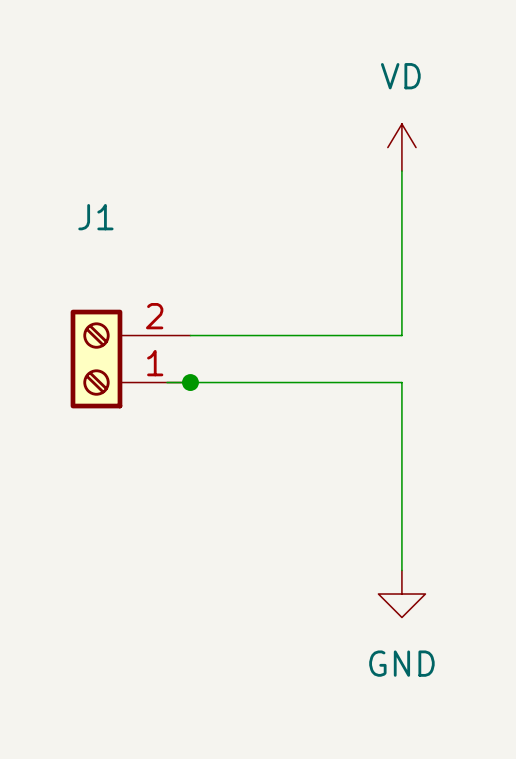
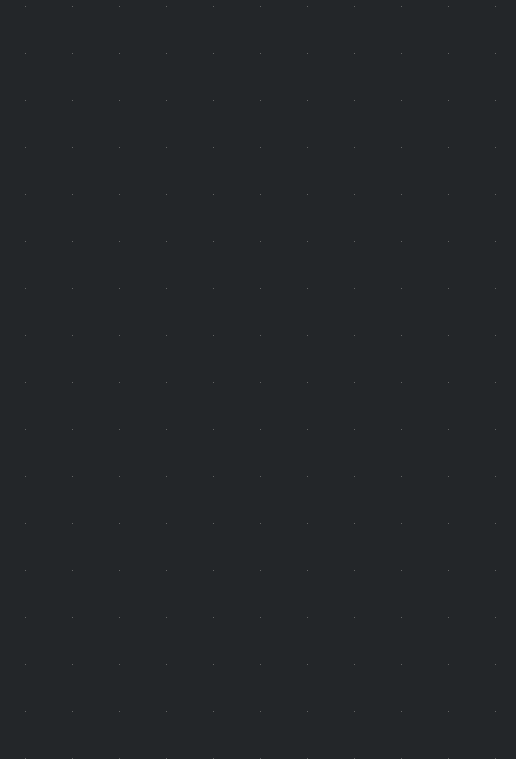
power symbol: VD (401, 147) -> none
wire: (401, 171) (401, 335) (190, 335) -> none
J1: (130, 359) -> none
wire: (166, 382) (401, 382) (401, 570) -> none
junction: (190, 382) -> none
power symbol: GND (401, 594) -> none

